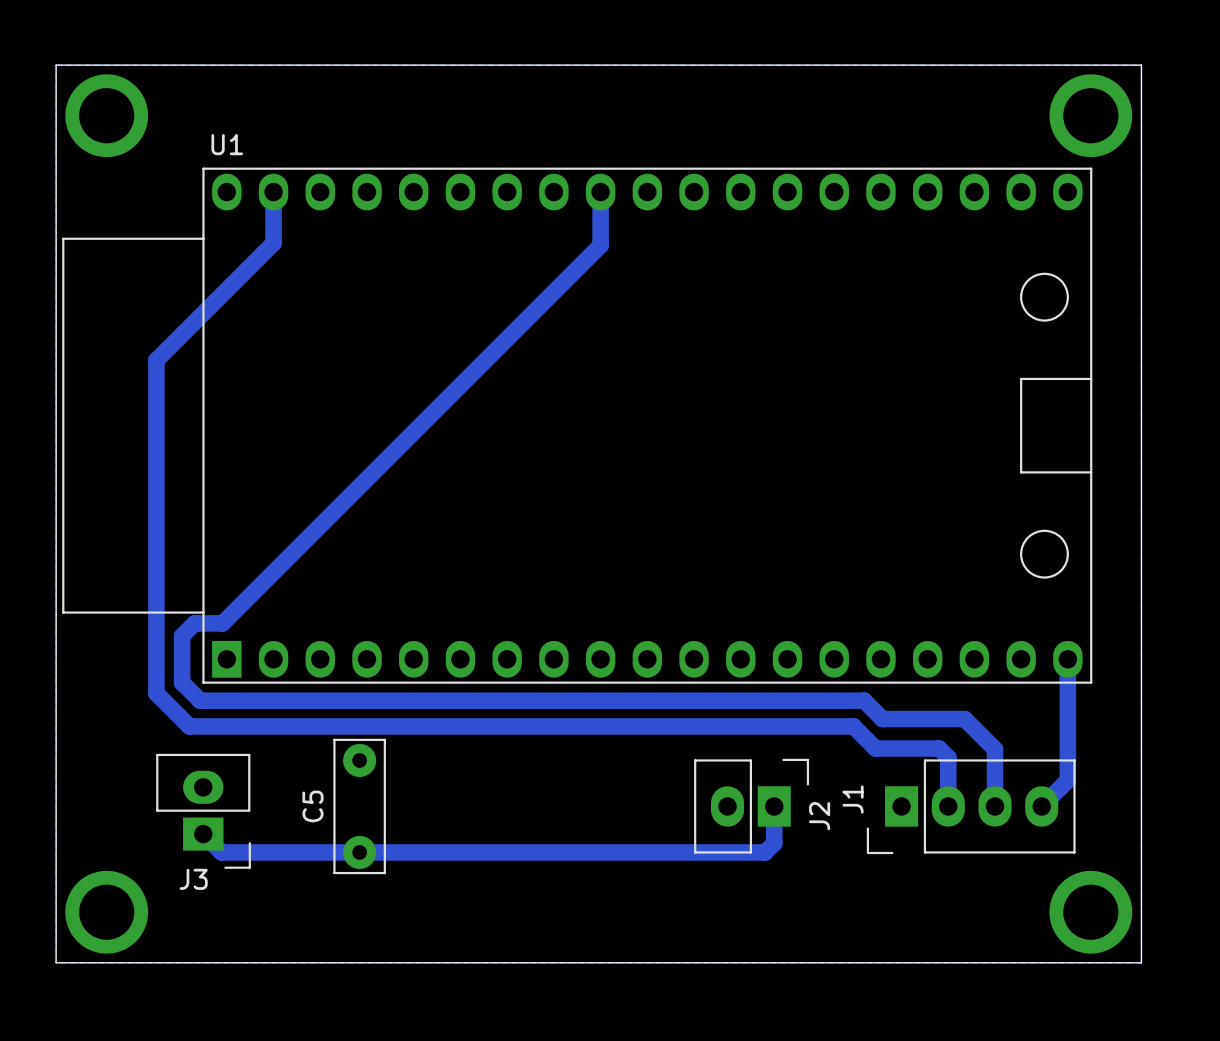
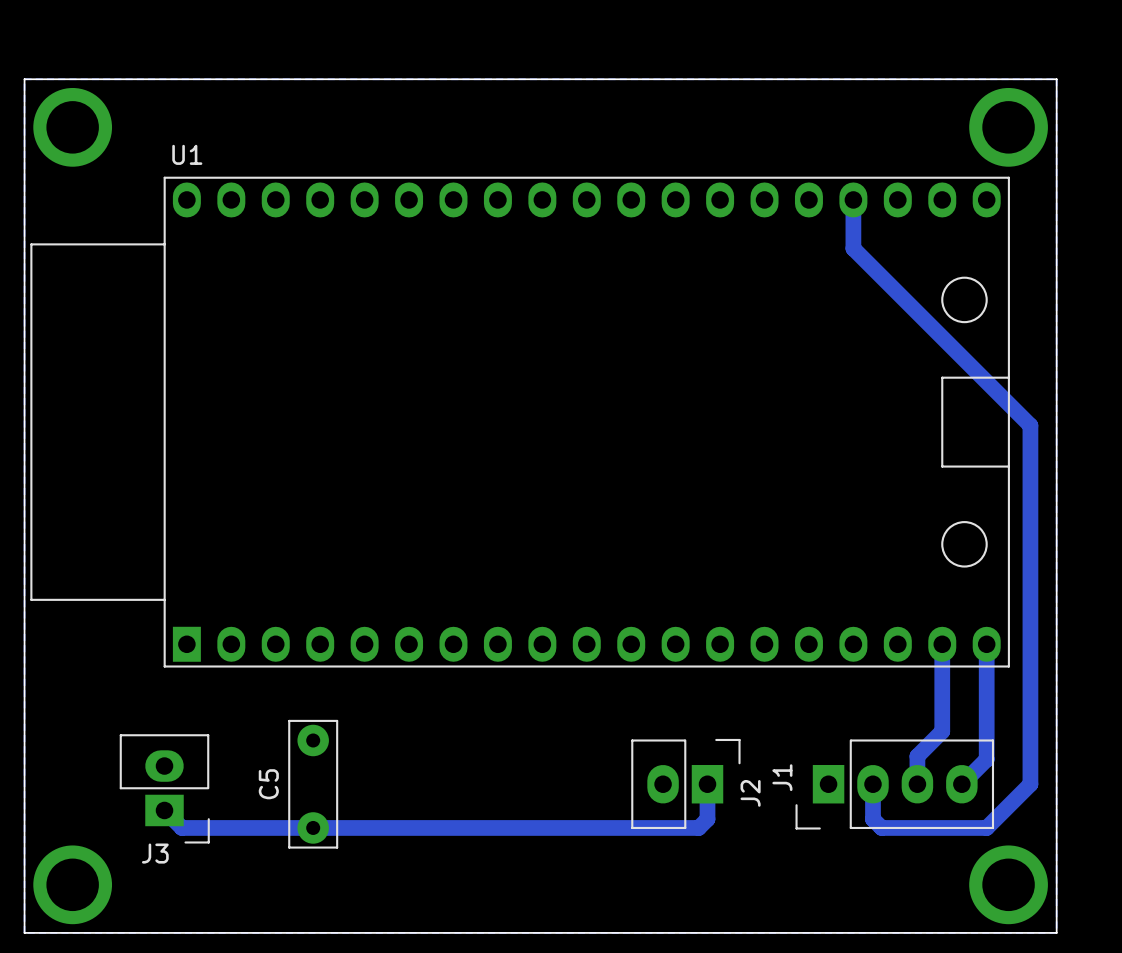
bottom track: (273, 192) (273, 243) (156, 360) (156, 693) (189, 726) (853, 726) (875, 748) (939, 748) (948, 757) (948, 806) -> (853, 199) (853, 248) (1030, 425) (1030, 784) (986, 827) (881, 827) (872, 819) (872, 784)
bottom track: (600, 192) (600, 245) (222, 623) (194, 623) (182, 635) (182, 682) (200, 700) (864, 700) (882, 719) (964, 719) (995, 749) (995, 777) -> (942, 644) (942, 731) (917, 756)

